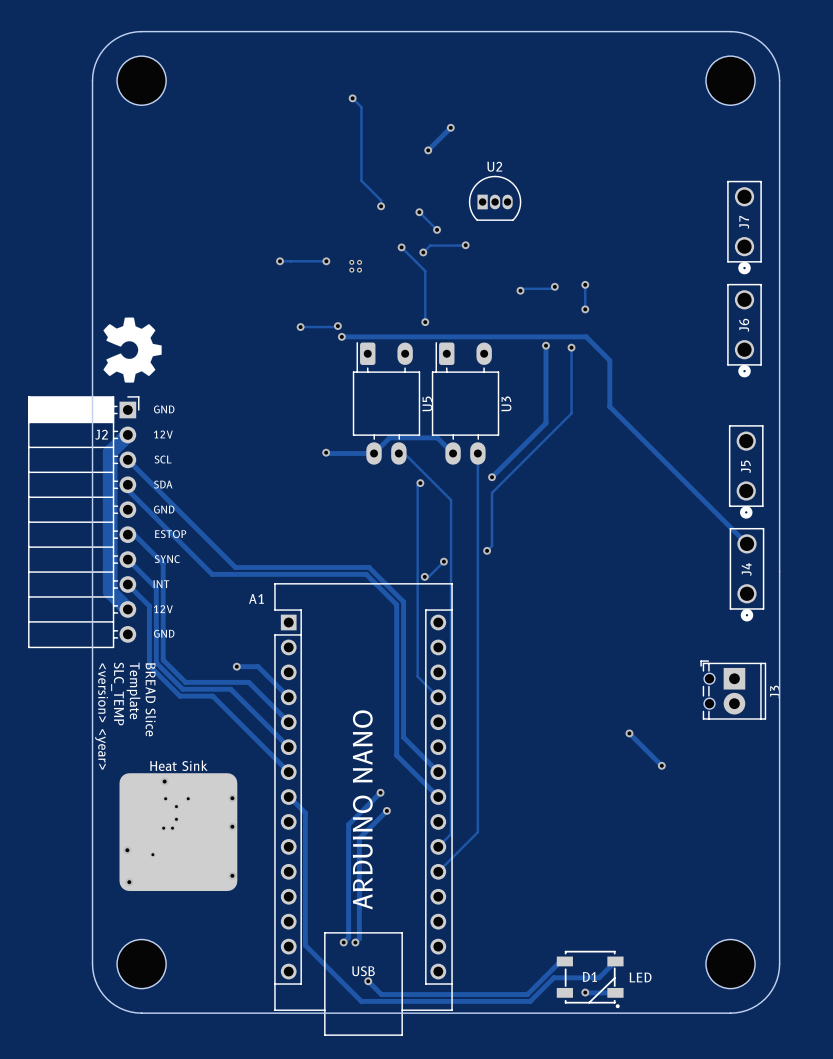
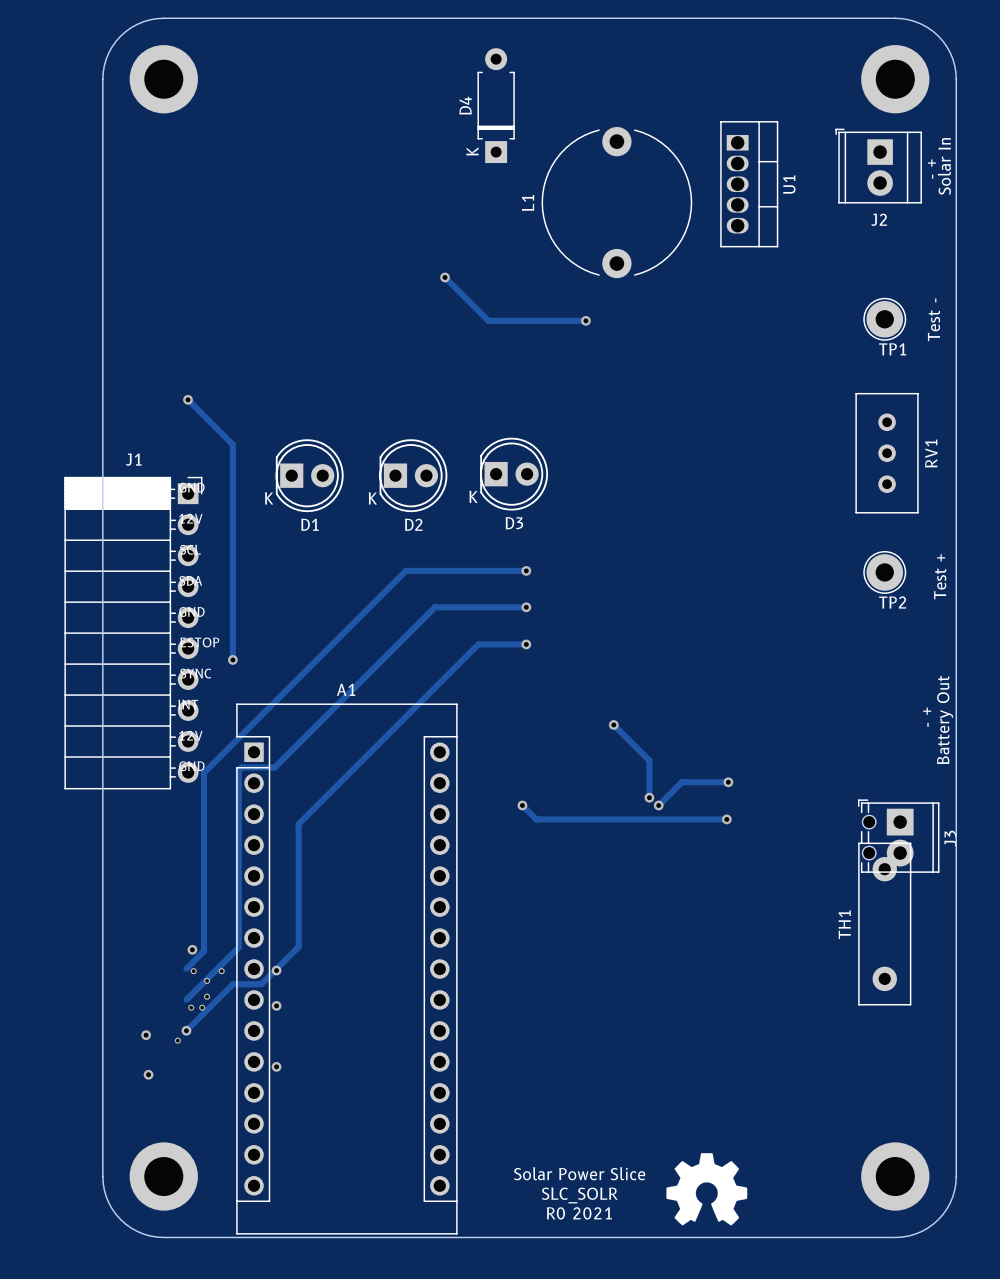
part footprint: [117, 56, 167, 106] -> [129, 45, 198, 114]
part footprint: [705, 56, 756, 106] -> [861, 45, 930, 114]
track: (352, 98) (361, 107) (361, 180) (381, 200) (381, 206) -> none
via: (352, 98) -> none
D4: none -> (496, 105)
track: (450, 127) (428, 150) -> none
via: (450, 127) -> none
via: (428, 150) -> none
text: none -> Solar In (944, 166)
text: none -> - + (931, 169)
U1: none -> (749, 184)
L1: none -> (616, 202)
U2: (495, 198) -> none
via: (381, 206) -> none
track: (419, 212) (437, 229) -> none
via: (419, 212) -> none
J7: (744, 227) -> none
via: (437, 229) -> none
track: none -> (445, 277) (488, 320) (585, 320)
via: none -> (445, 277)
track: (465, 245) (430, 245) (423, 252) -> none
via: (465, 245) -> none
track: (401, 247) (425, 271) (425, 322) -> none
via: (401, 247) -> none
via: (423, 252) -> none
track: (280, 261) (326, 261) -> none
via: (280, 261) -> none
via: (326, 261) -> none
part: (355, 266) -> none
TP1: none -> (884, 319)
text: none -> Test - (934, 319)
via: none -> (585, 320)
track: (585, 284) (585, 309) -> none
via: (585, 284) -> none
track: (554, 286) (552, 288) (522, 288) (520, 290) -> none
via: (554, 286) -> none
via: (520, 290) -> none
via: (585, 309) -> none
drawing: [103, 317, 162, 383] -> none
via: (425, 322) -> none
track: (337, 326) (300, 327) -> none
via: (337, 326) -> none
via: (300, 327) -> none
J6: (744, 330) -> none
track: (341, 336) (586, 336) (609, 360) (609, 406) (746, 543) -> none
via: (341, 336) -> none
track: none -> (187, 399) (232, 444) (232, 659)
via: none -> (187, 399)
track: (546, 345) (546, 423) (492, 477) -> none
via: (546, 345) -> none
track: (571, 347) (571, 413) (492, 492) (492, 545) (487, 550) -> none
via: (571, 347) -> none
RV1: none -> (887, 453)
J2 footprint: [28, 396, 140, 649] -> [835, 128, 922, 204]
D3: none -> (514, 474)
D2: none -> (413, 475)
U5: (386, 403) -> none
U3: (465, 403) -> none
J2 name position: J2 (101, 434) -> J2 (879, 219)
track: (127, 434) (110, 452) (110, 591) (127, 609) -> none
track: (326, 452) (374, 453) (389, 437) (437, 437) (453, 453) -> none
via: (326, 452) -> none
track: (398, 453) (404, 453) (451, 500) (451, 834) (438, 846) -> none
track: (477, 453) (477, 832) (438, 871) -> none
track: (127, 459) (235, 567) (369, 567) (403, 601) (403, 737) (438, 772) -> none
J5: (746, 471) -> none
track: none -> (526, 570) (405, 570) (204, 772) (204, 951) (186, 968)
via: none -> (526, 570)
via: (492, 477) -> none
TP2: none -> (884, 572)
text: none -> Test + (940, 576)
track: (420, 483) (417, 485) (417, 676) (438, 697) -> none
via: (420, 483) -> none
track: (127, 484) (127, 490) (212, 574) (366, 574) (396, 604) (396, 755) (438, 797) -> none
track: none -> (526, 607) (434, 607) (274, 767) (241, 767) (238, 770) (238, 947) (186, 999)
via: none -> (526, 607)
J1: none -> (133, 633)
track: (127, 534) (134, 534) (163, 563) (163, 660) (185, 682) (248, 682) (288, 722) -> none
track: none -> (526, 644) (478, 644) (298, 824) (298, 946) (261, 984) (232, 984) (186, 1030)
via: none -> (526, 644)
via: none -> (232, 659)
via: (487, 550) -> none
track: (127, 559) (156, 588) (156, 662) (182, 689) (230, 689) (288, 747) -> none
track: (443, 561) (428, 576) (424, 576) -> none
via: (443, 561) -> none
J4: (746, 574) -> none
via: (424, 576) -> none
A1 footprint: [274, 583, 453, 1036] -> [236, 703, 458, 1235]
track: (127, 584) (149, 606) (149, 665) (179, 696) (212, 696) (288, 772) -> none
text: none -> - + (927, 717)
text: none -> Battery Out (945, 719)
A1 name position: A1 (256, 598) -> A1 (346, 689)
track: none -> (613, 724) (649, 760) (649, 797)
via: none -> (613, 724)
track: none -> (728, 782) (681, 782) (658, 805)
via: none -> (728, 782)
via: none -> (649, 797)
track: none -> (522, 805) (536, 819) (726, 819)
via: none -> (522, 805)
via: none -> (658, 805)
track: (236, 666) (258, 666) (288, 697) -> none
via: (236, 666) -> none
via: none -> (726, 819)
text: Template (133, 690) -> none
text: SLC_TEMP (117, 693) -> none
text: BREAD Slice (150, 699) -> none
text: <version> <year> (101, 716) -> none
track: (629, 733) (661, 765) -> none
via: (629, 733) -> none
TH1: none -> (884, 924)
via: (661, 765) -> none
track: (380, 792) (348, 824) (348, 937) (343, 942) -> none
via: (380, 792) -> none
track: (288, 797) (305, 812) (305, 945) (361, 1001) (530, 1001) (553, 977) (599, 977) (615, 961) -> none
text: ARDUINO NANO (362, 809) -> none
track: (386, 810) (359, 838) (359, 938) (355, 942) -> none
via: (386, 810) -> none
part: (178, 832) -> none
via: none -> (186, 1030)
part footprint: [117, 939, 167, 989] -> [129, 1142, 198, 1211]
part footprint: [705, 939, 756, 989] -> [861, 1142, 930, 1211]
via: (343, 942) -> none
via: (355, 942) -> none
drawing: none -> [666, 1153, 748, 1226]
D1 footprint: [556, 950, 624, 1009] -> [275, 439, 344, 513]
text: none -> Solar Power Slice (579, 1173)
track: (564, 961) (560, 961) (527, 994) (381, 994) (368, 981) -> none
D1 name position: D1 (589, 976) -> D1 (309, 524)
text: LED (640, 977) -> none
text: none -> SLC_SOLR (579, 1195)
via: (368, 981) -> none
track: (585, 992) (615, 992) -> none
via: (585, 992) -> none
text: none -> R0 2021 (579, 1213)

